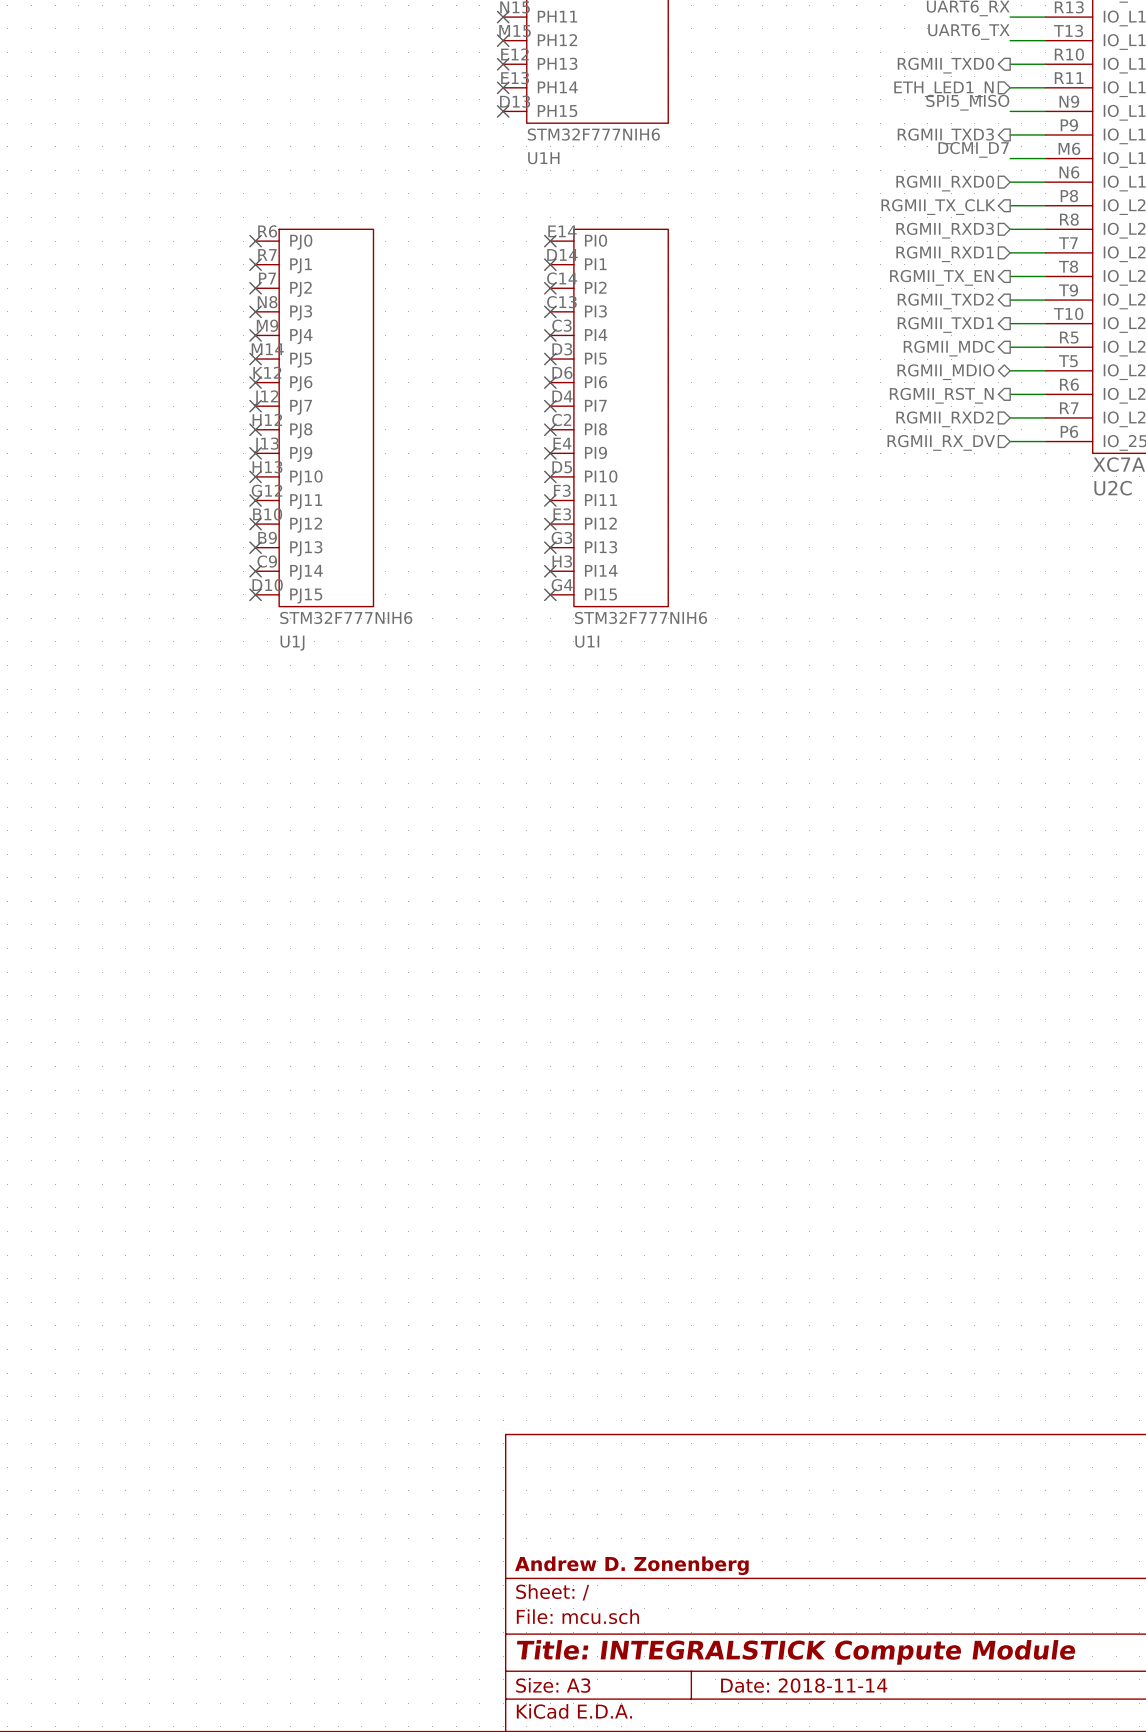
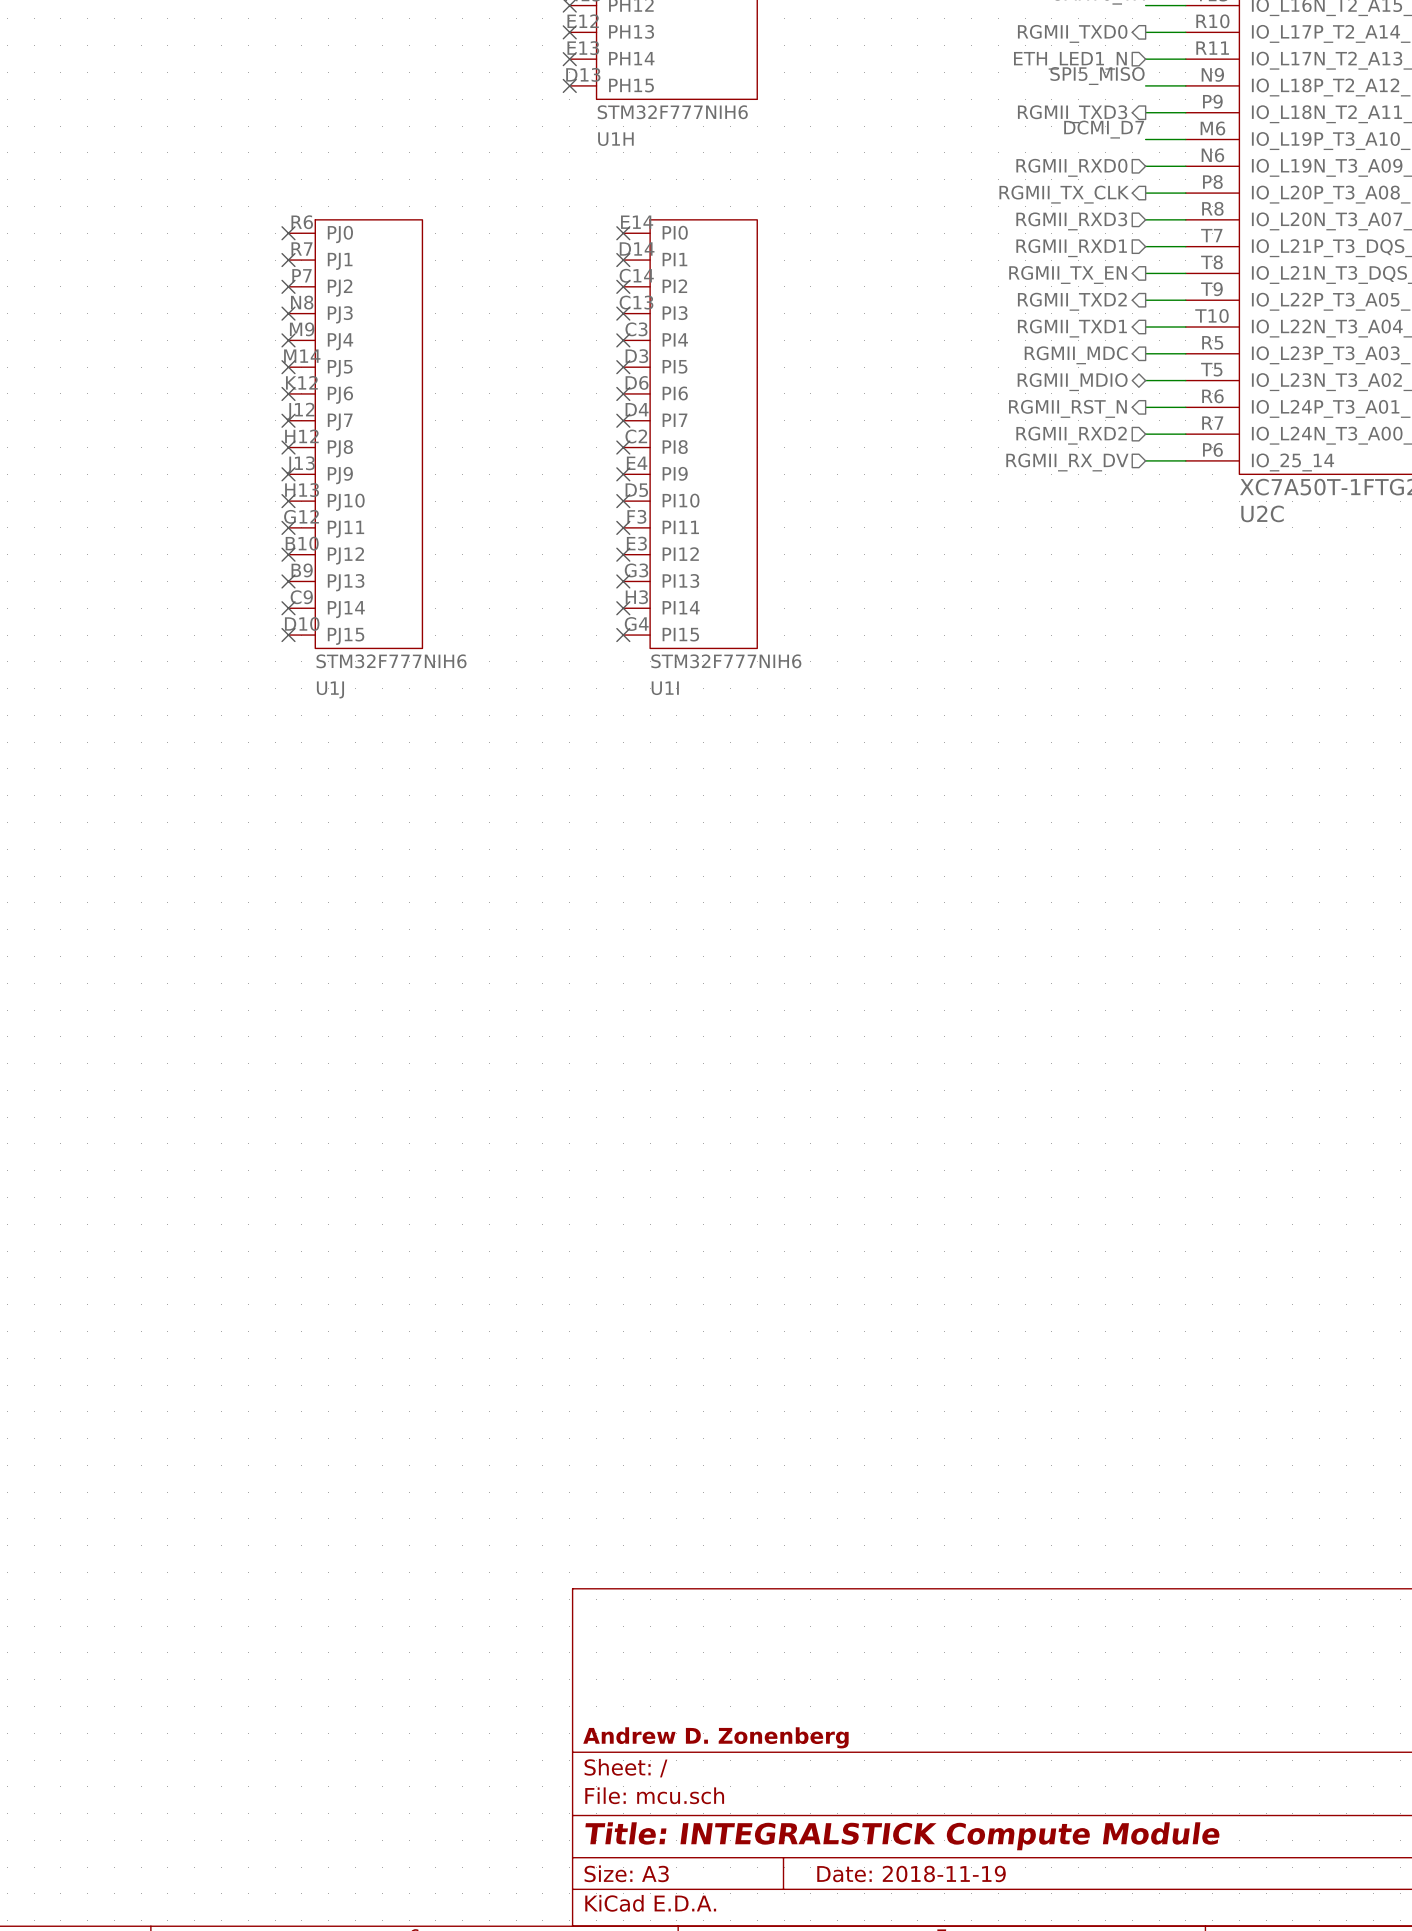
title block: Date: 2018-11-14 (804, 1685) -> Date: 2018-11-19 (911, 1873)

